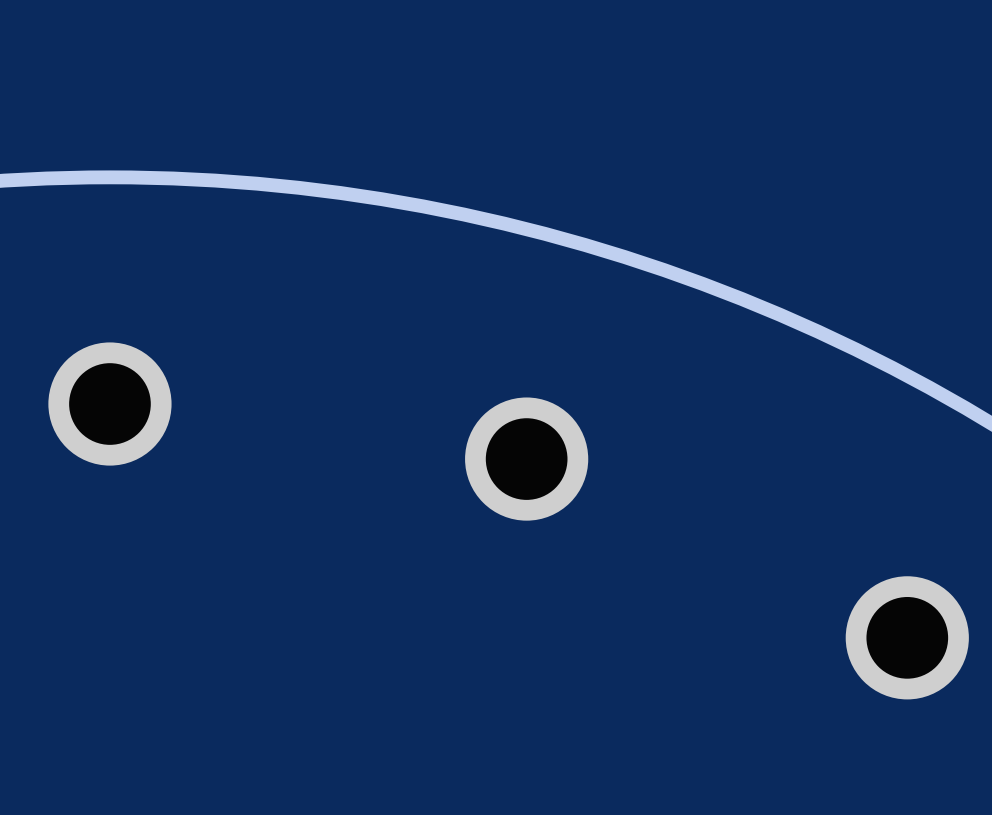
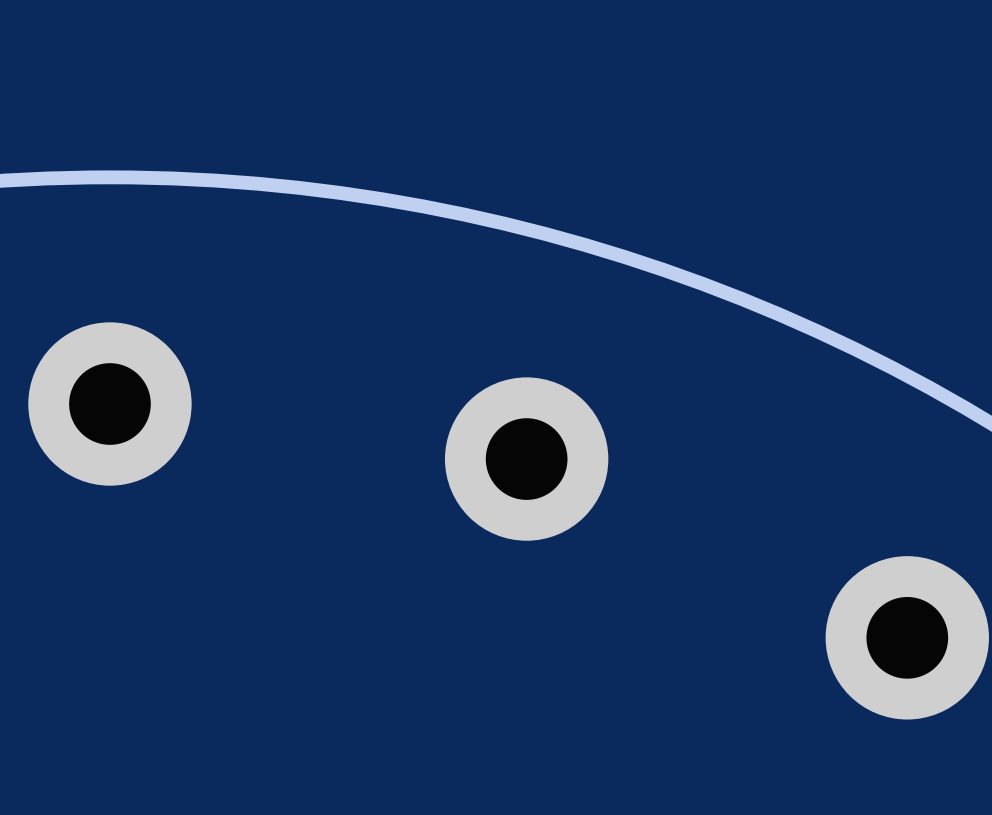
part footprint: [48, 342, 172, 466] -> [28, 322, 192, 486]
part footprint: [465, 397, 589, 521] -> [444, 377, 609, 541]
part footprint: [845, 576, 969, 700] -> [825, 556, 989, 720]

